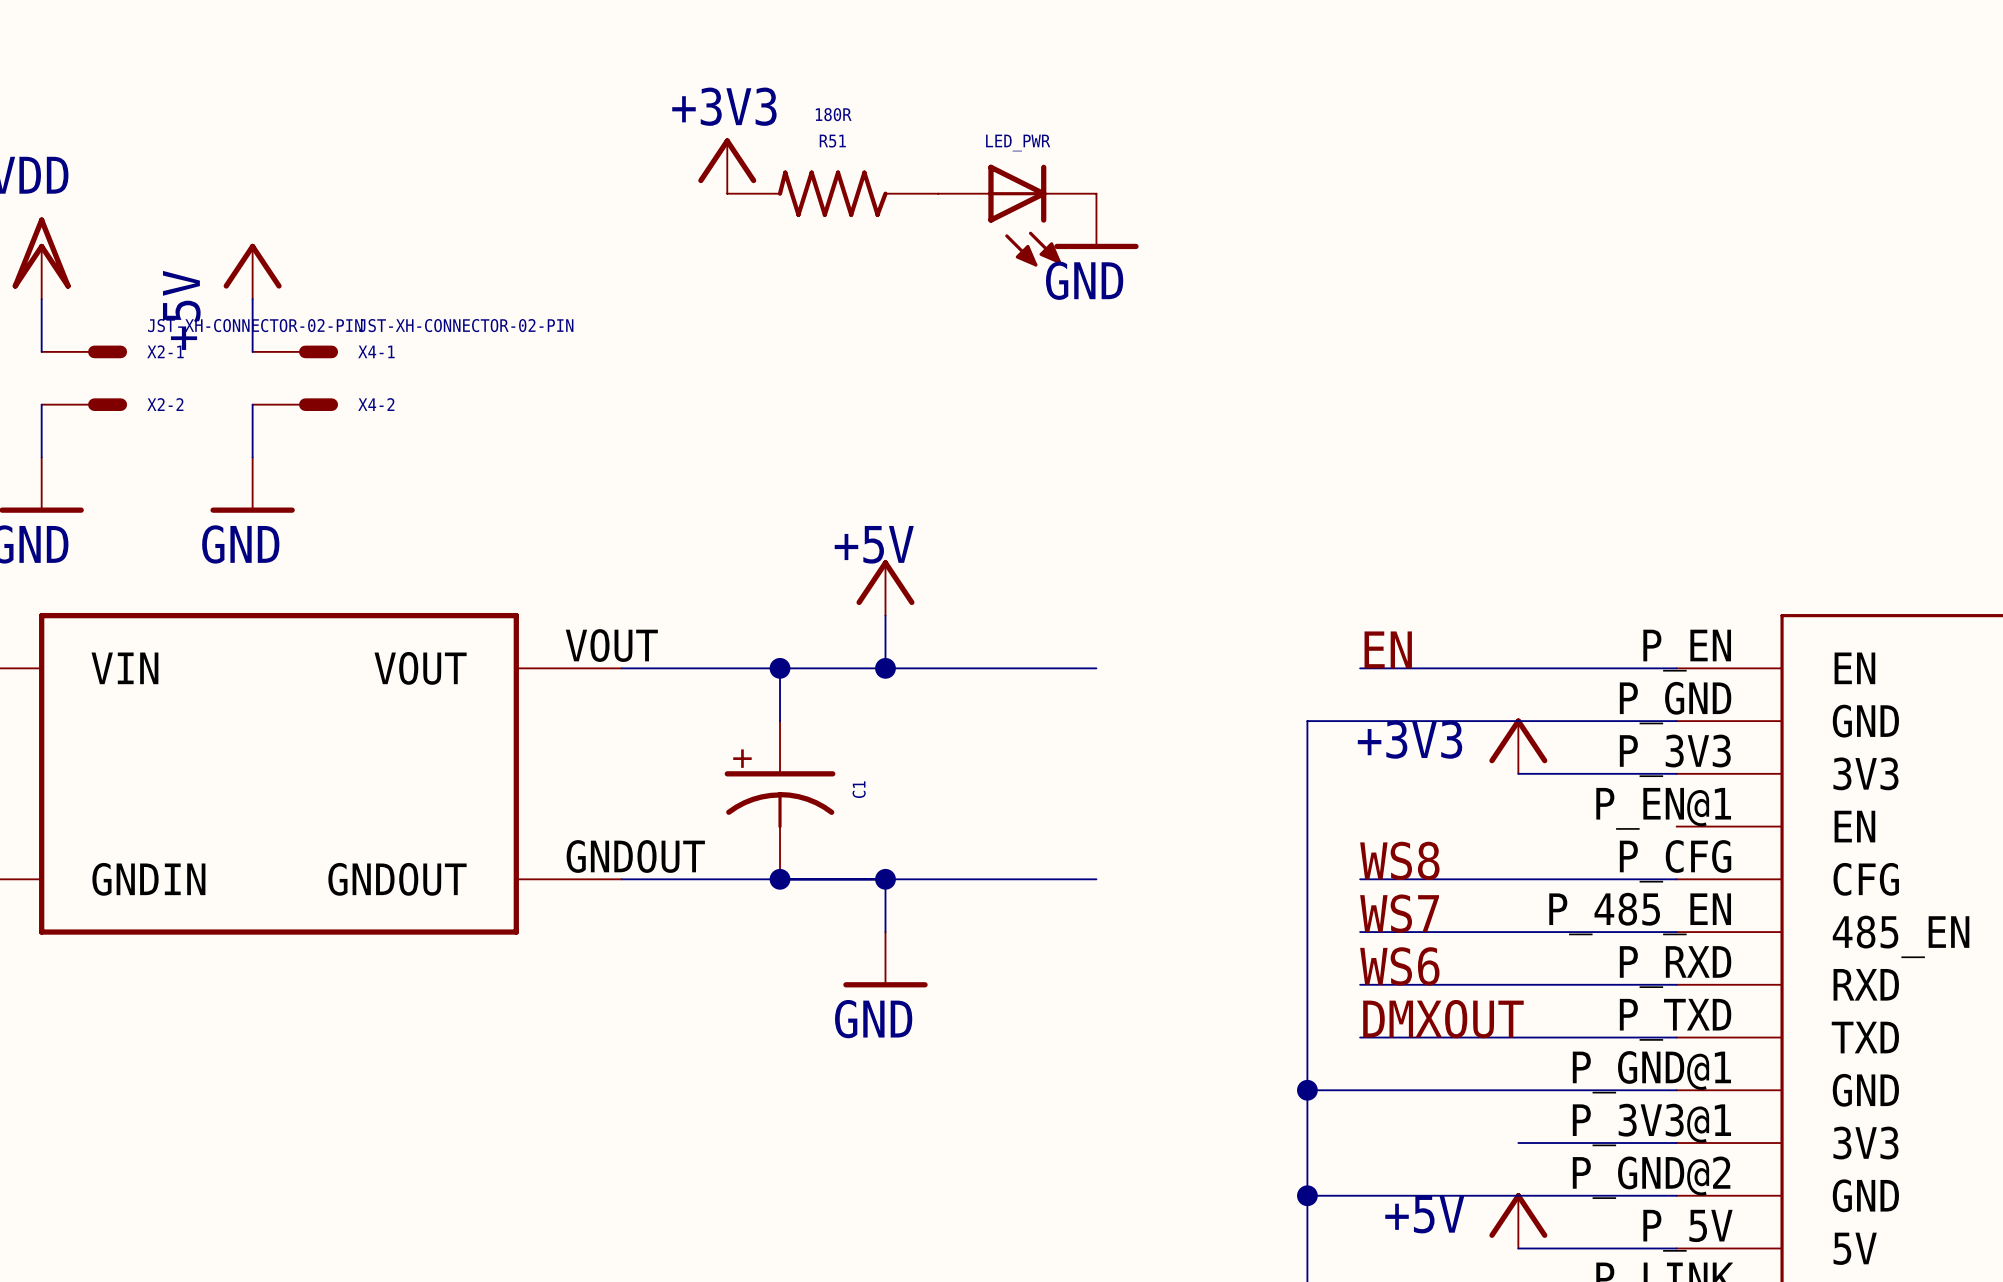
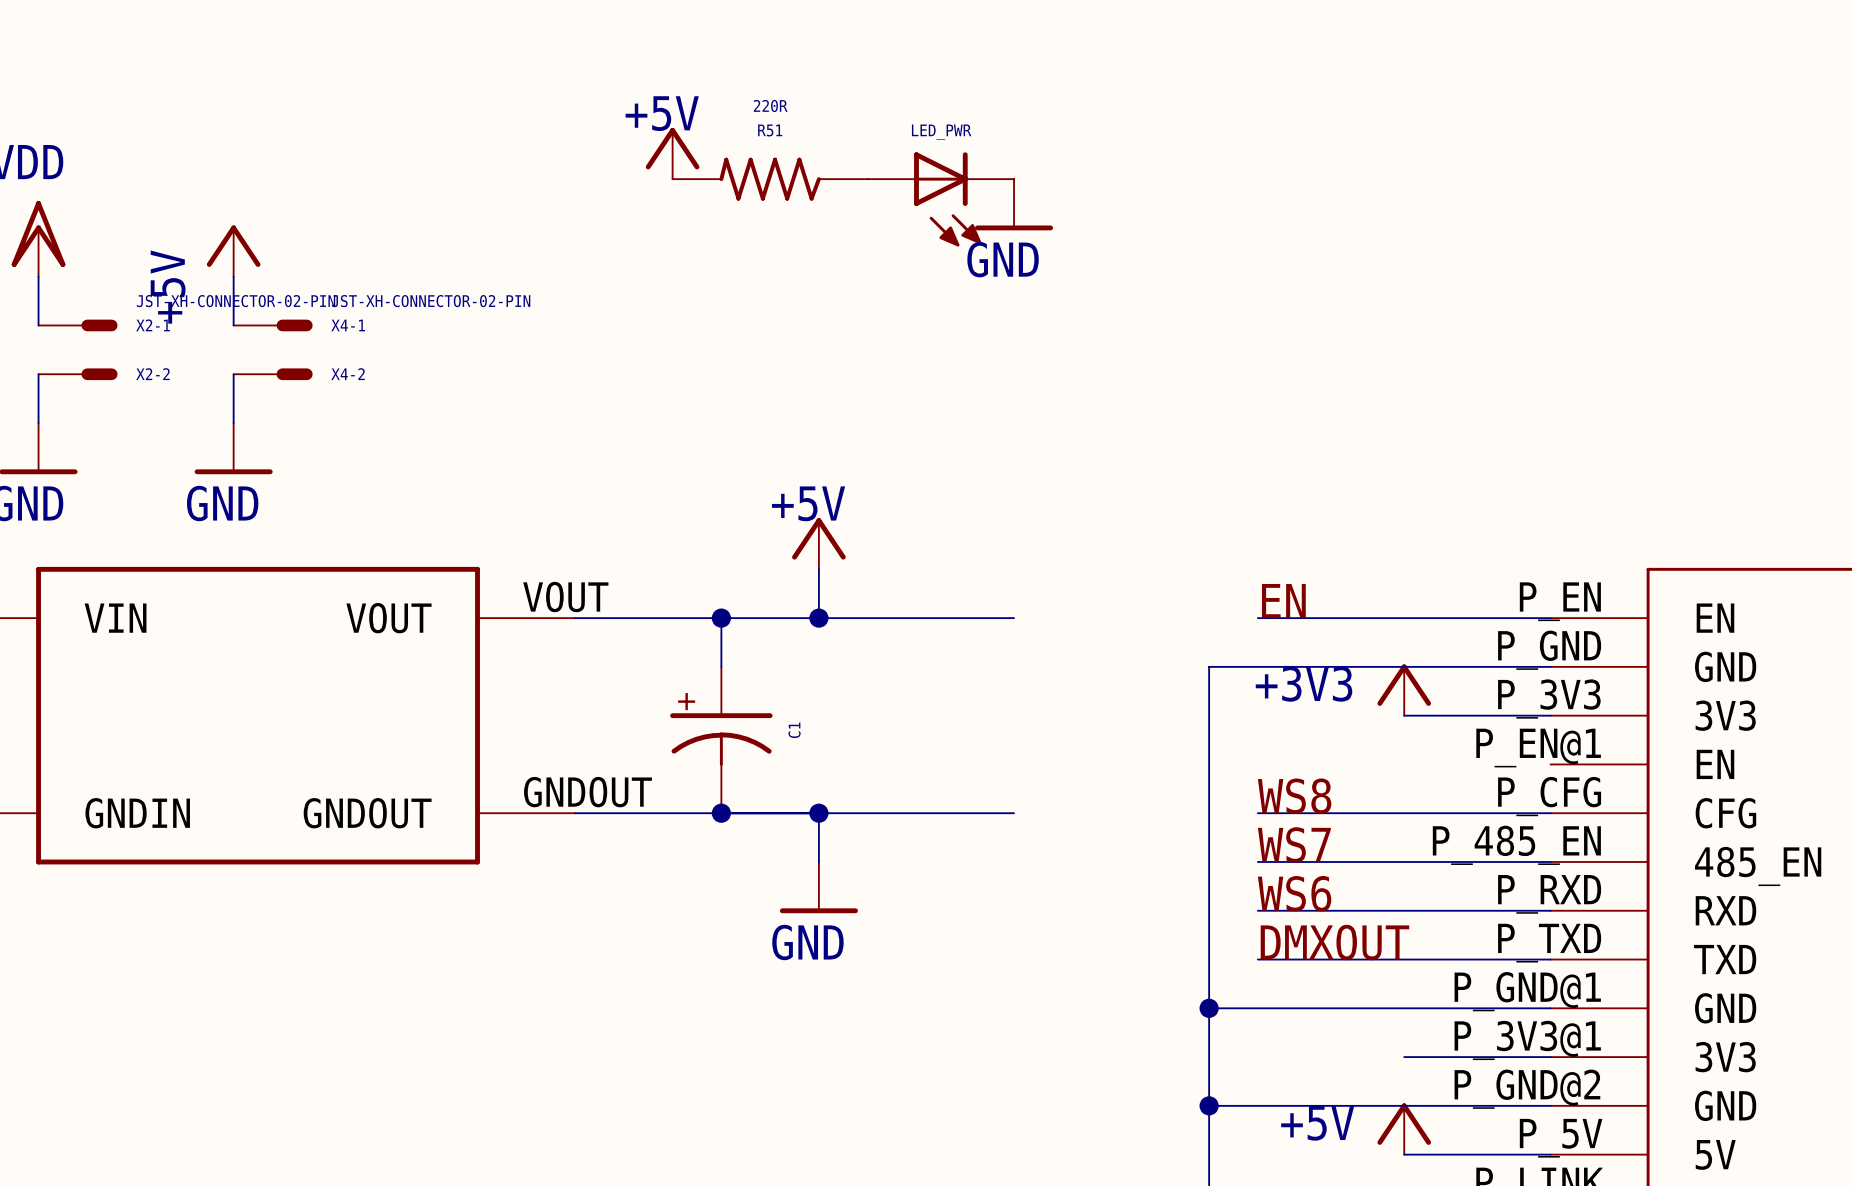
R51 value: 180R (833, 114) -> 220R (770, 105)
power symbol: +3V3 (727, 166) -> +5V (672, 153)

